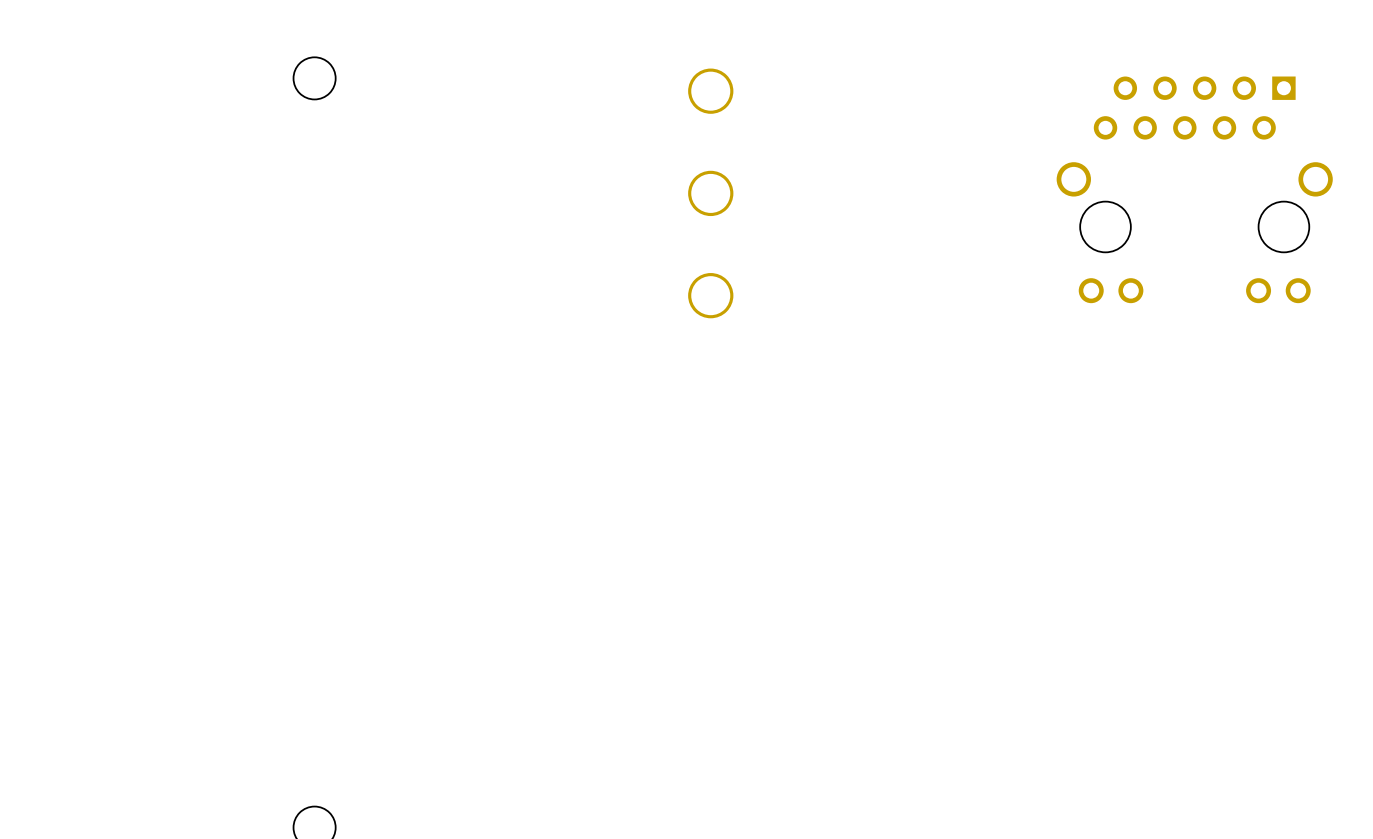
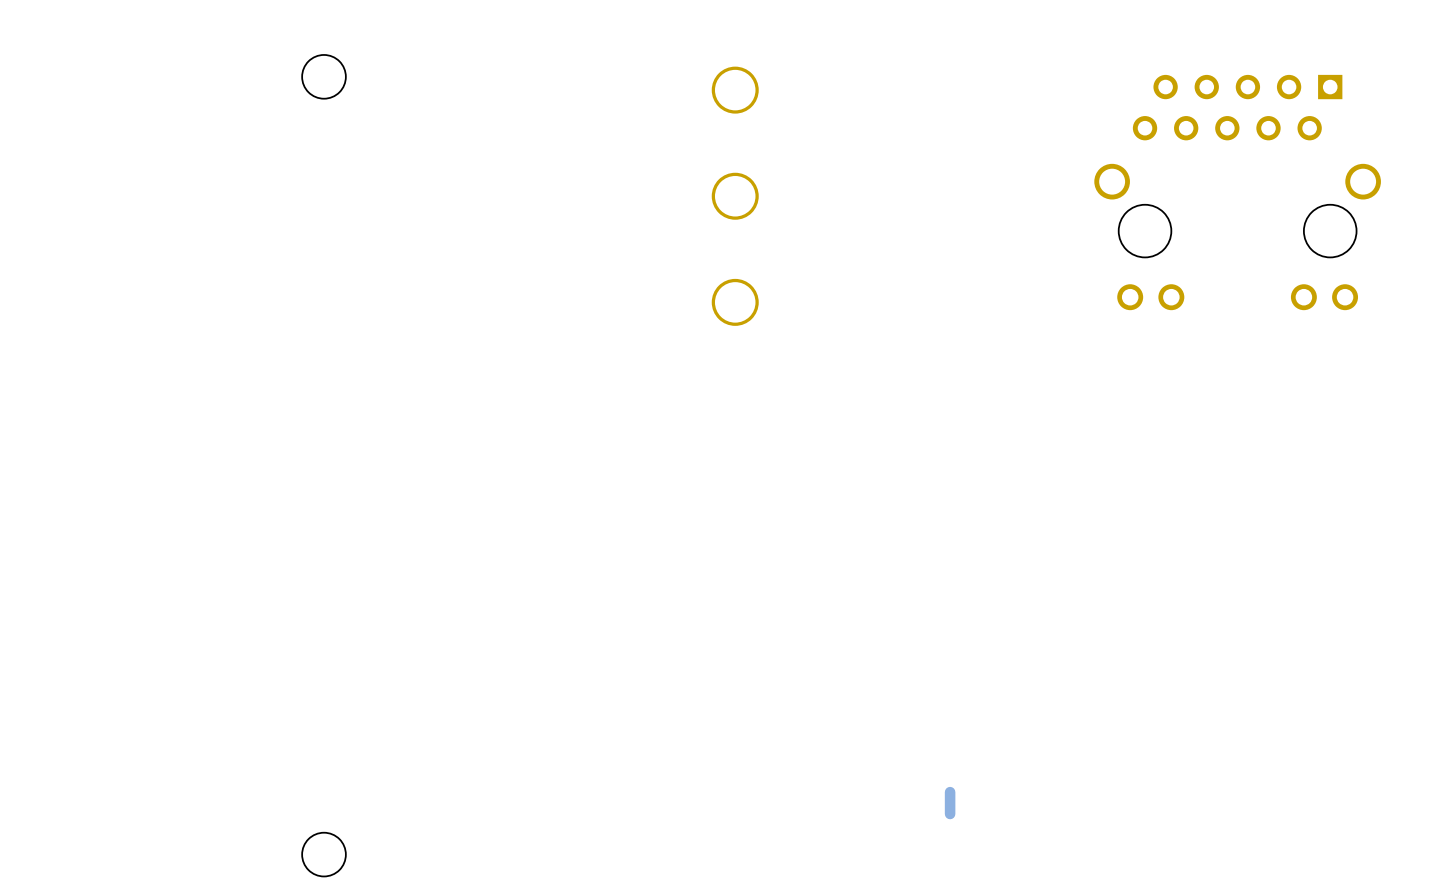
part: none -> (950, 803)

